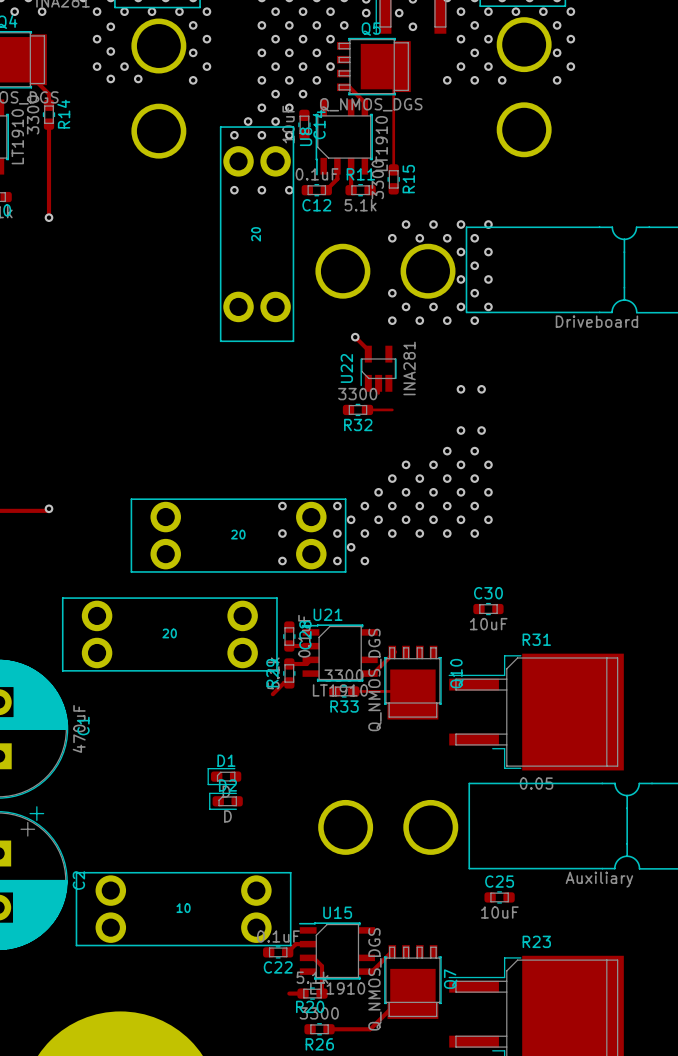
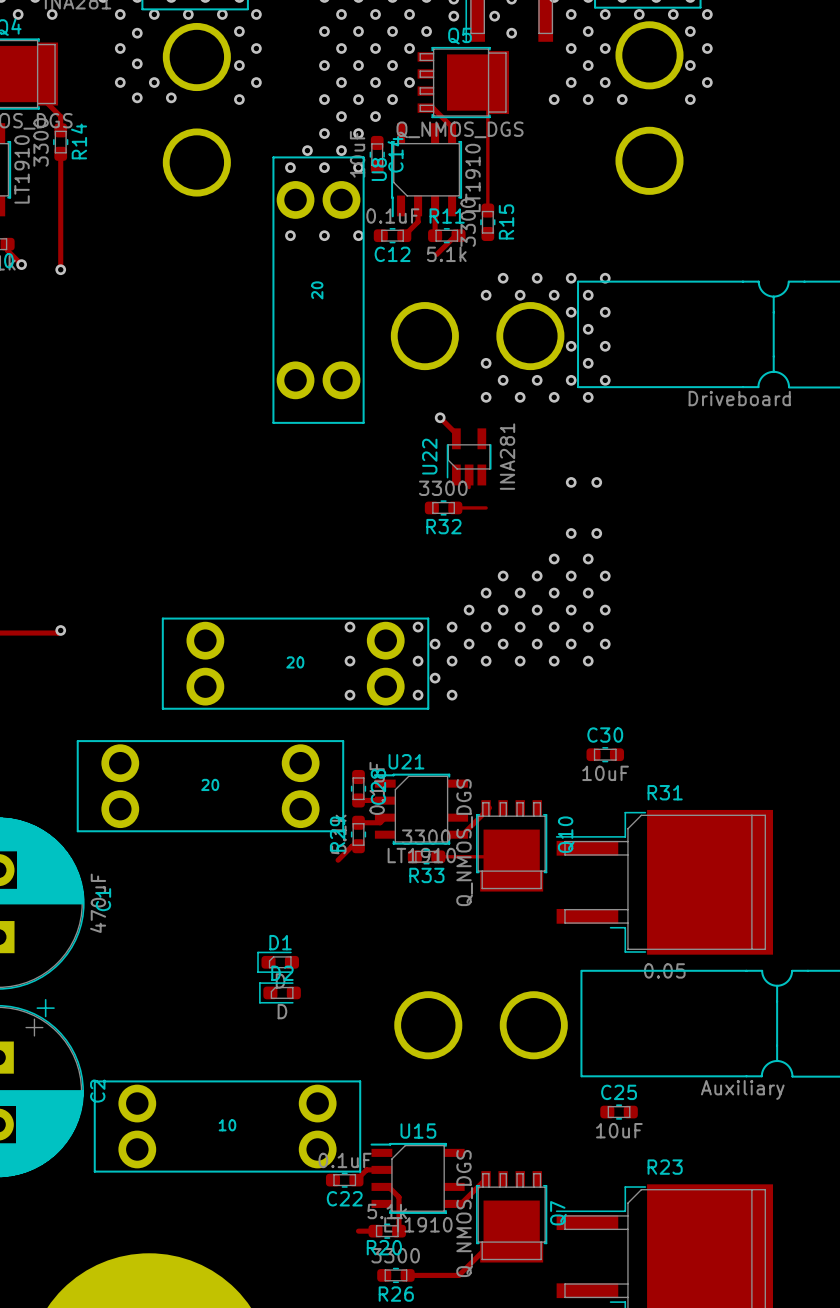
track: none -> (455, 235) (436, 254)
track: none -> (7, 244) (7, 250) (21, 264)
via: none -> (21, 264)

